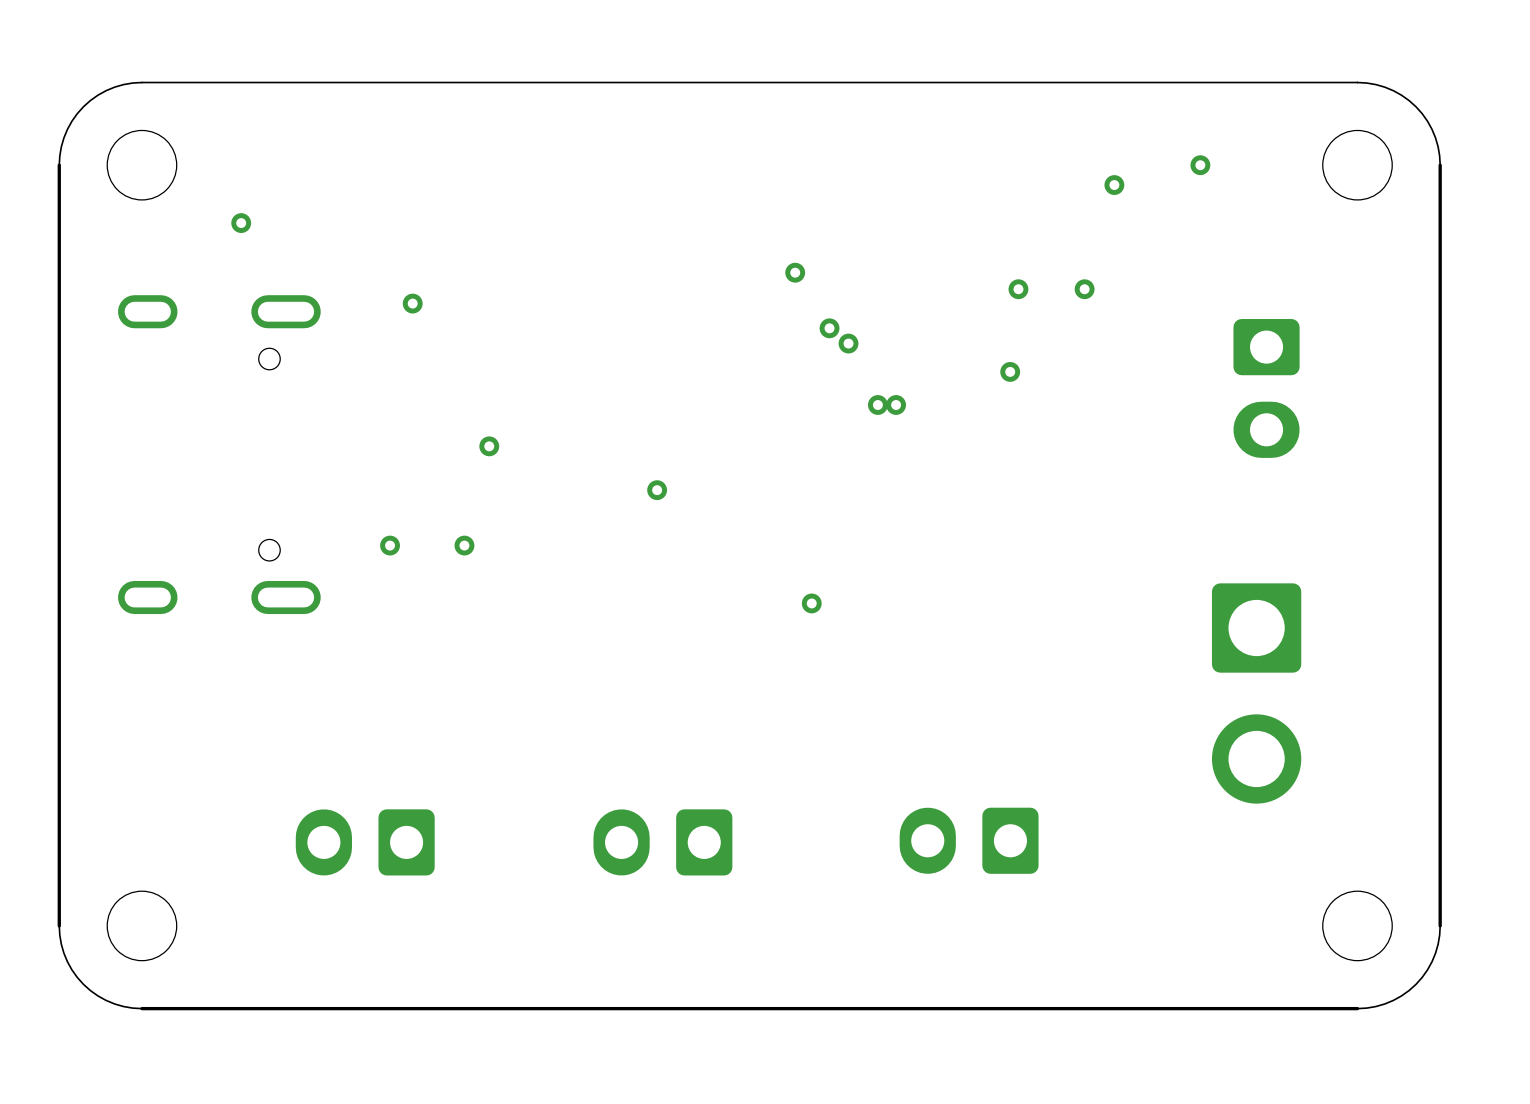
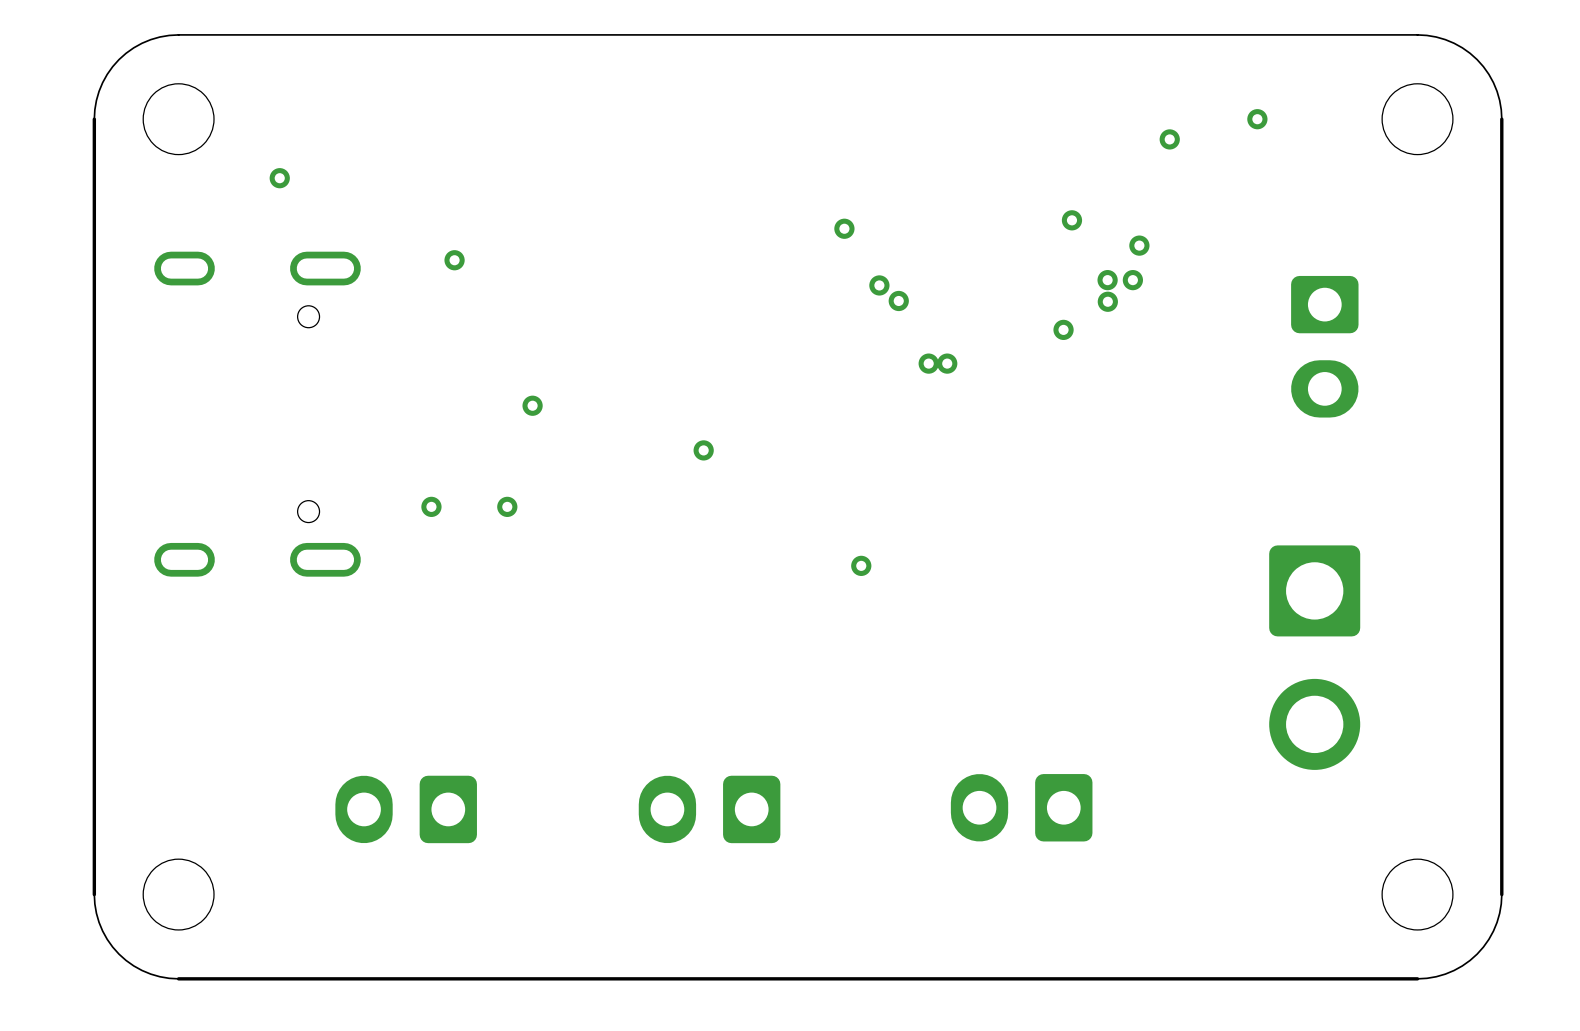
via: none -> (1071, 220)
via: (1018, 289) -> none
via: none -> (1107, 280)
via: none -> (1132, 280)
via: none -> (1107, 301)

